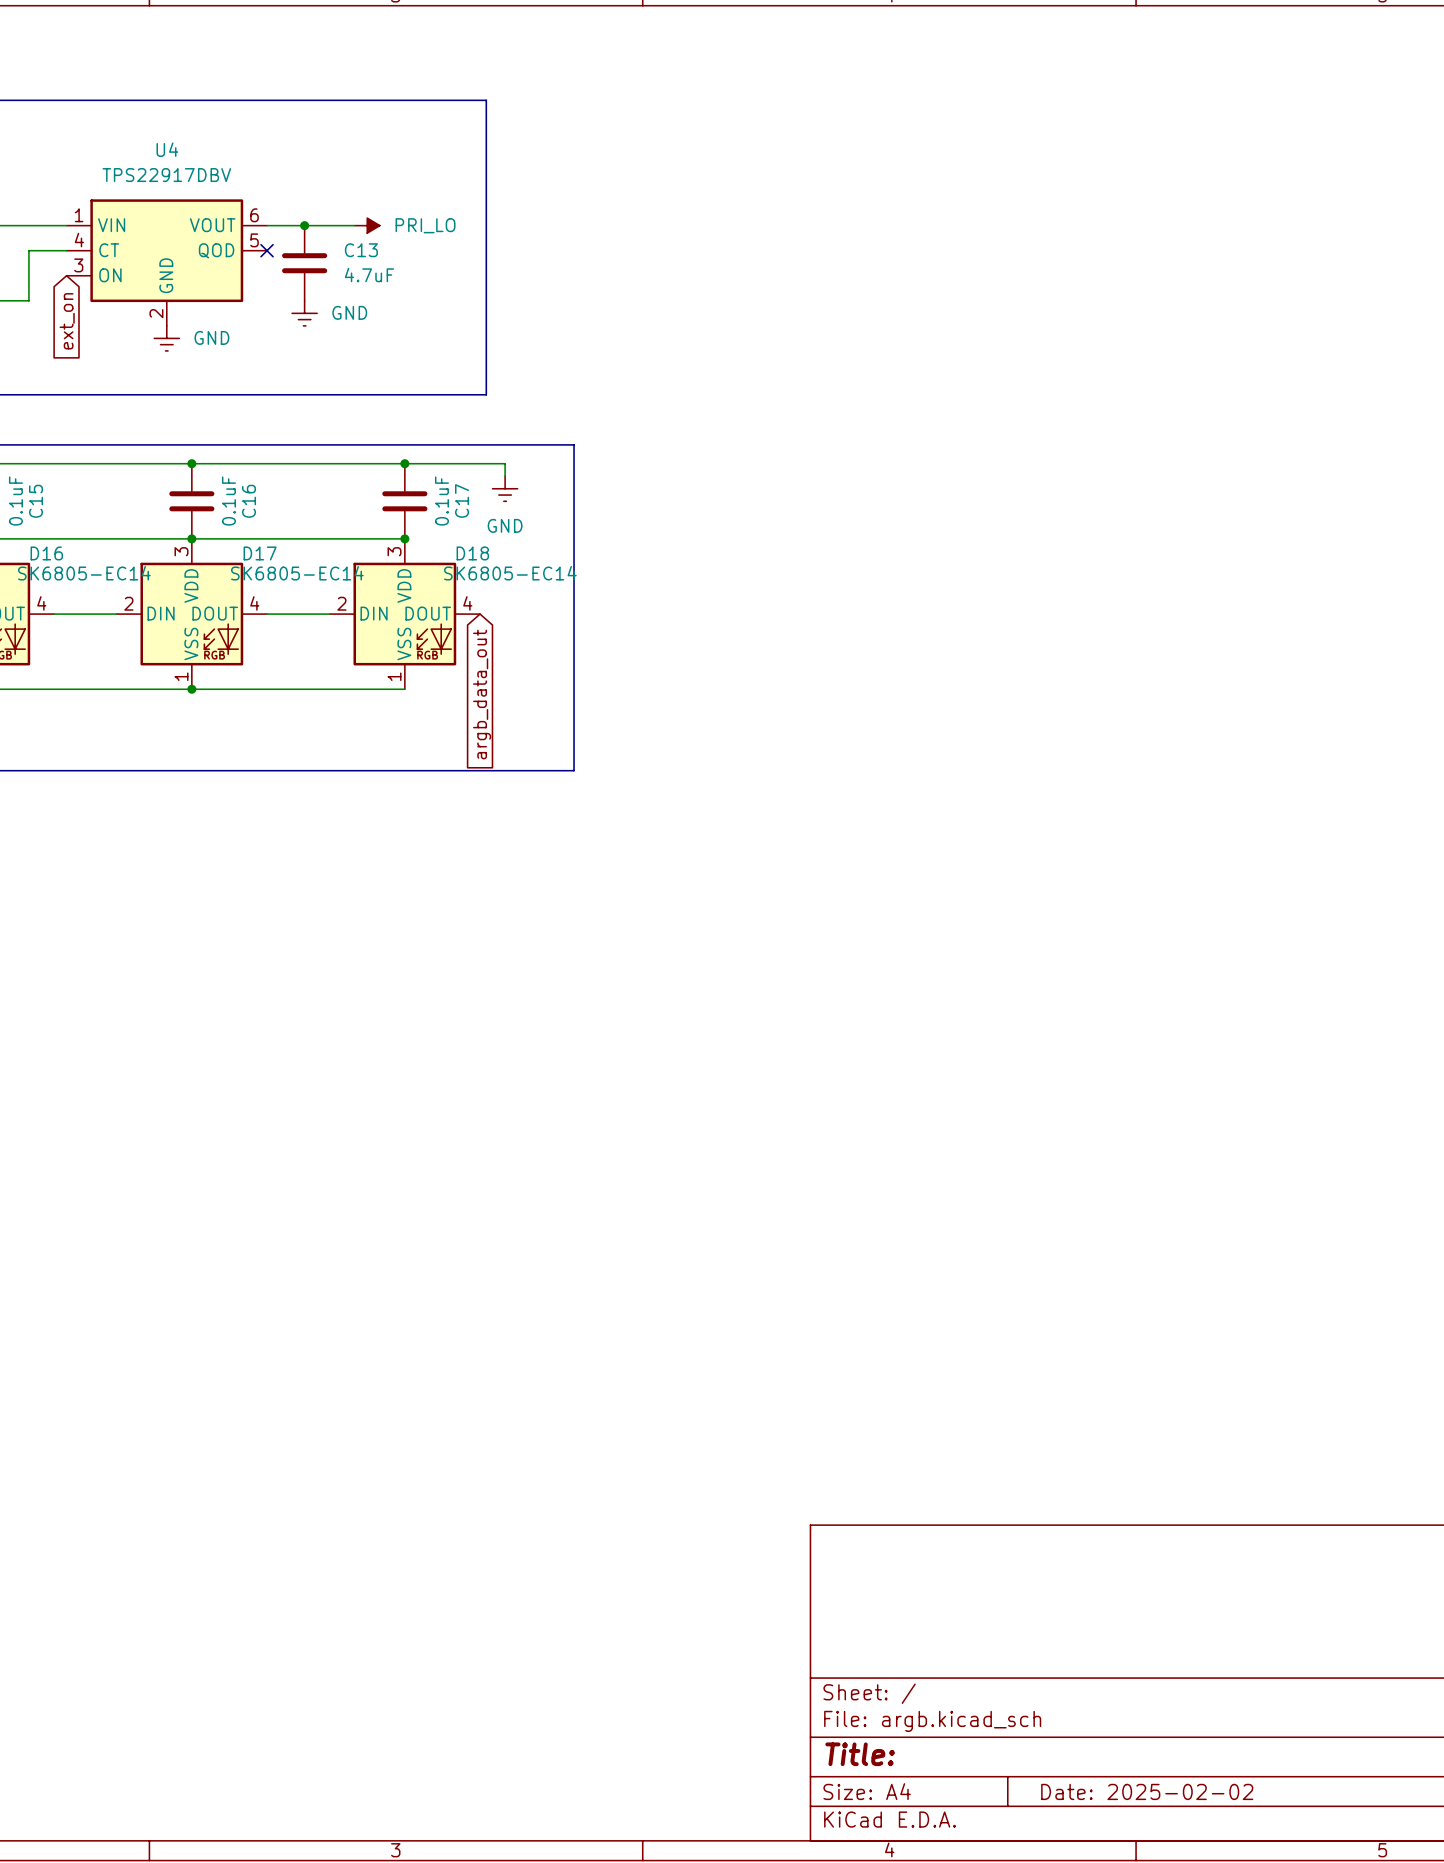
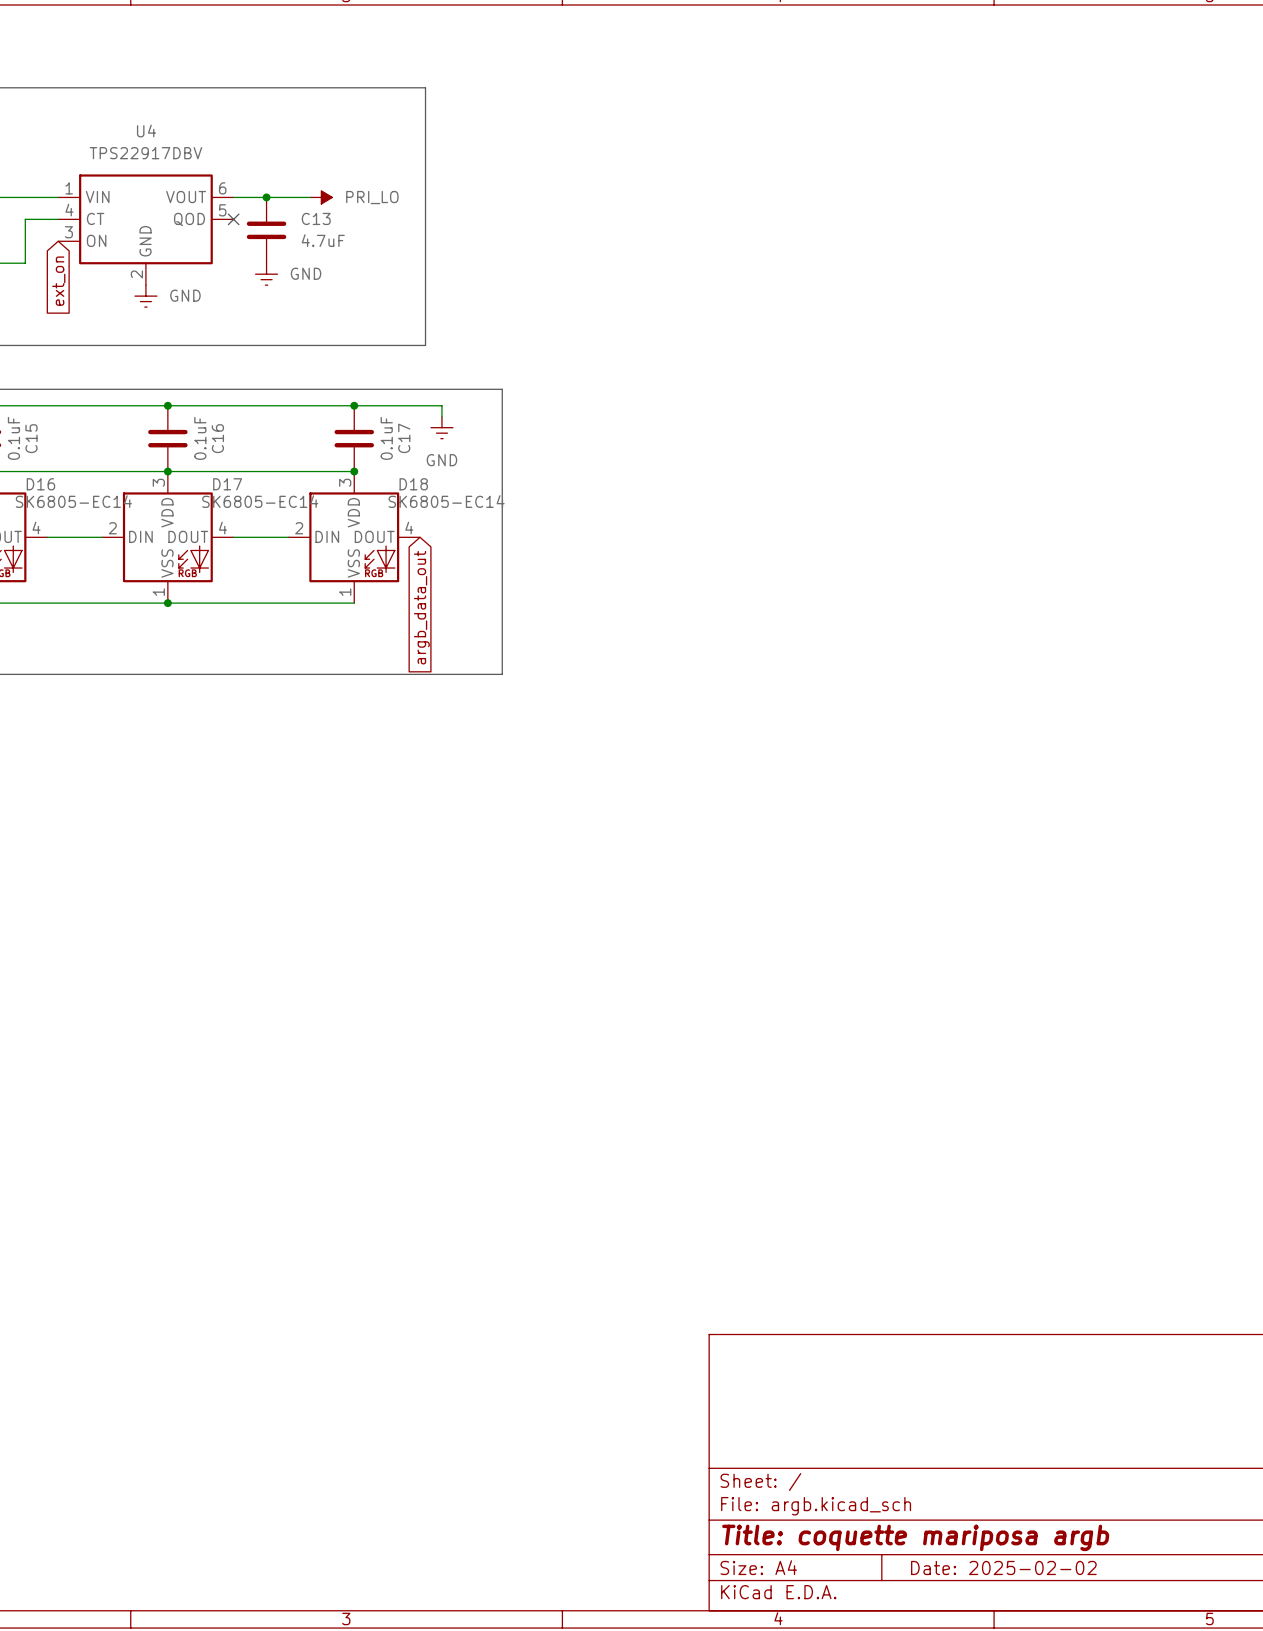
title block: Title: (860, 1754) -> Title: coquette mariposa argb (915, 1537)

